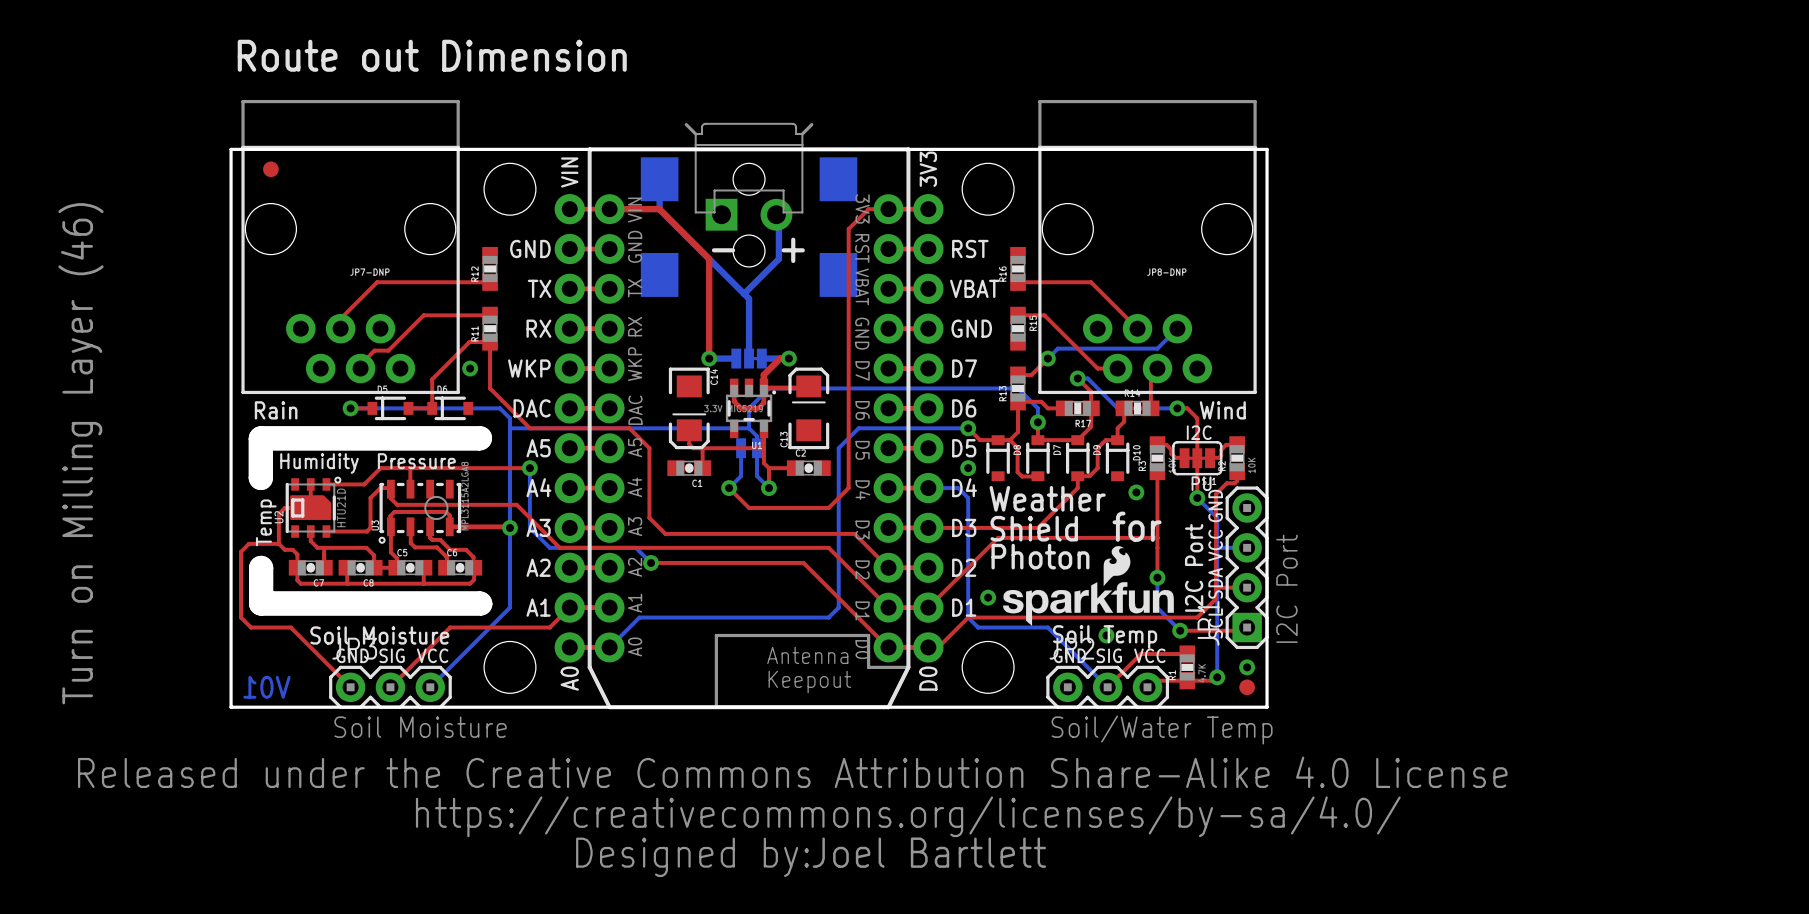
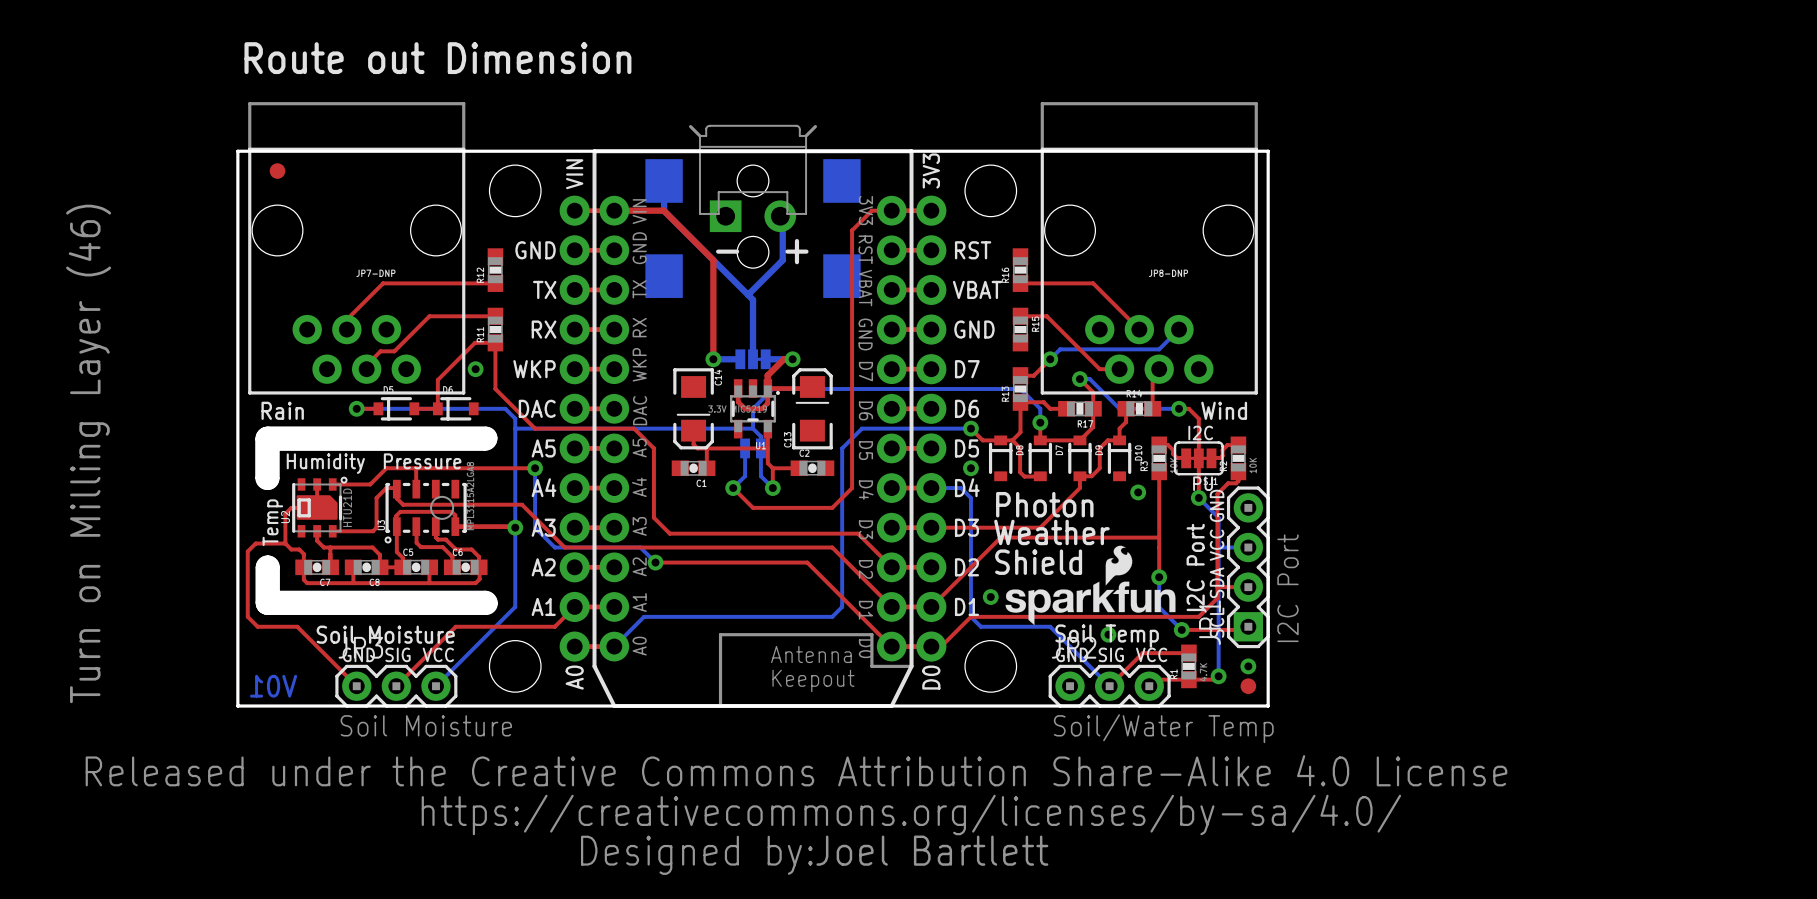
text position: Weather (1047, 498) -> Weather (1051, 532)
text: for (1137, 526) -> none
text position: Shield (1034, 528) -> Shield (1038, 562)
text position: Photon (1040, 556) -> Photon (1044, 504)

